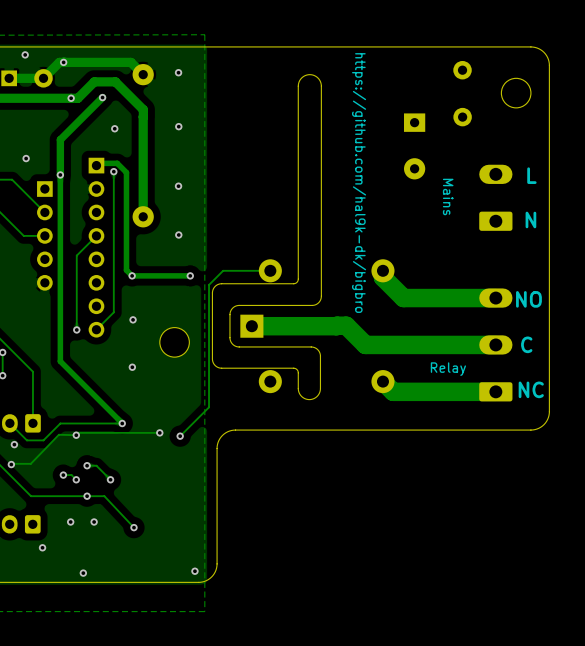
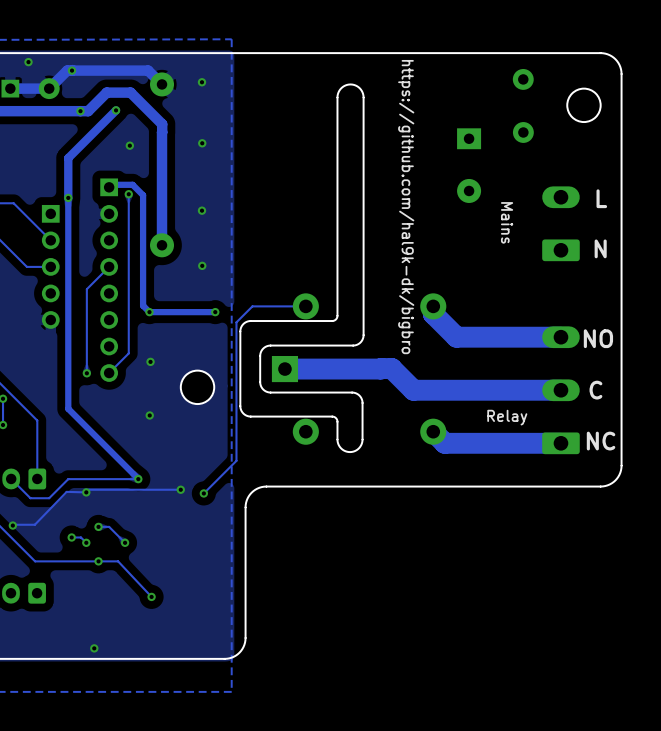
via: (26, 158) -> none
via: (14, 444) -> none
via: (70, 521) -> none
via: (94, 521) -> none
via: (42, 547) -> none
via: (194, 571) -> none

